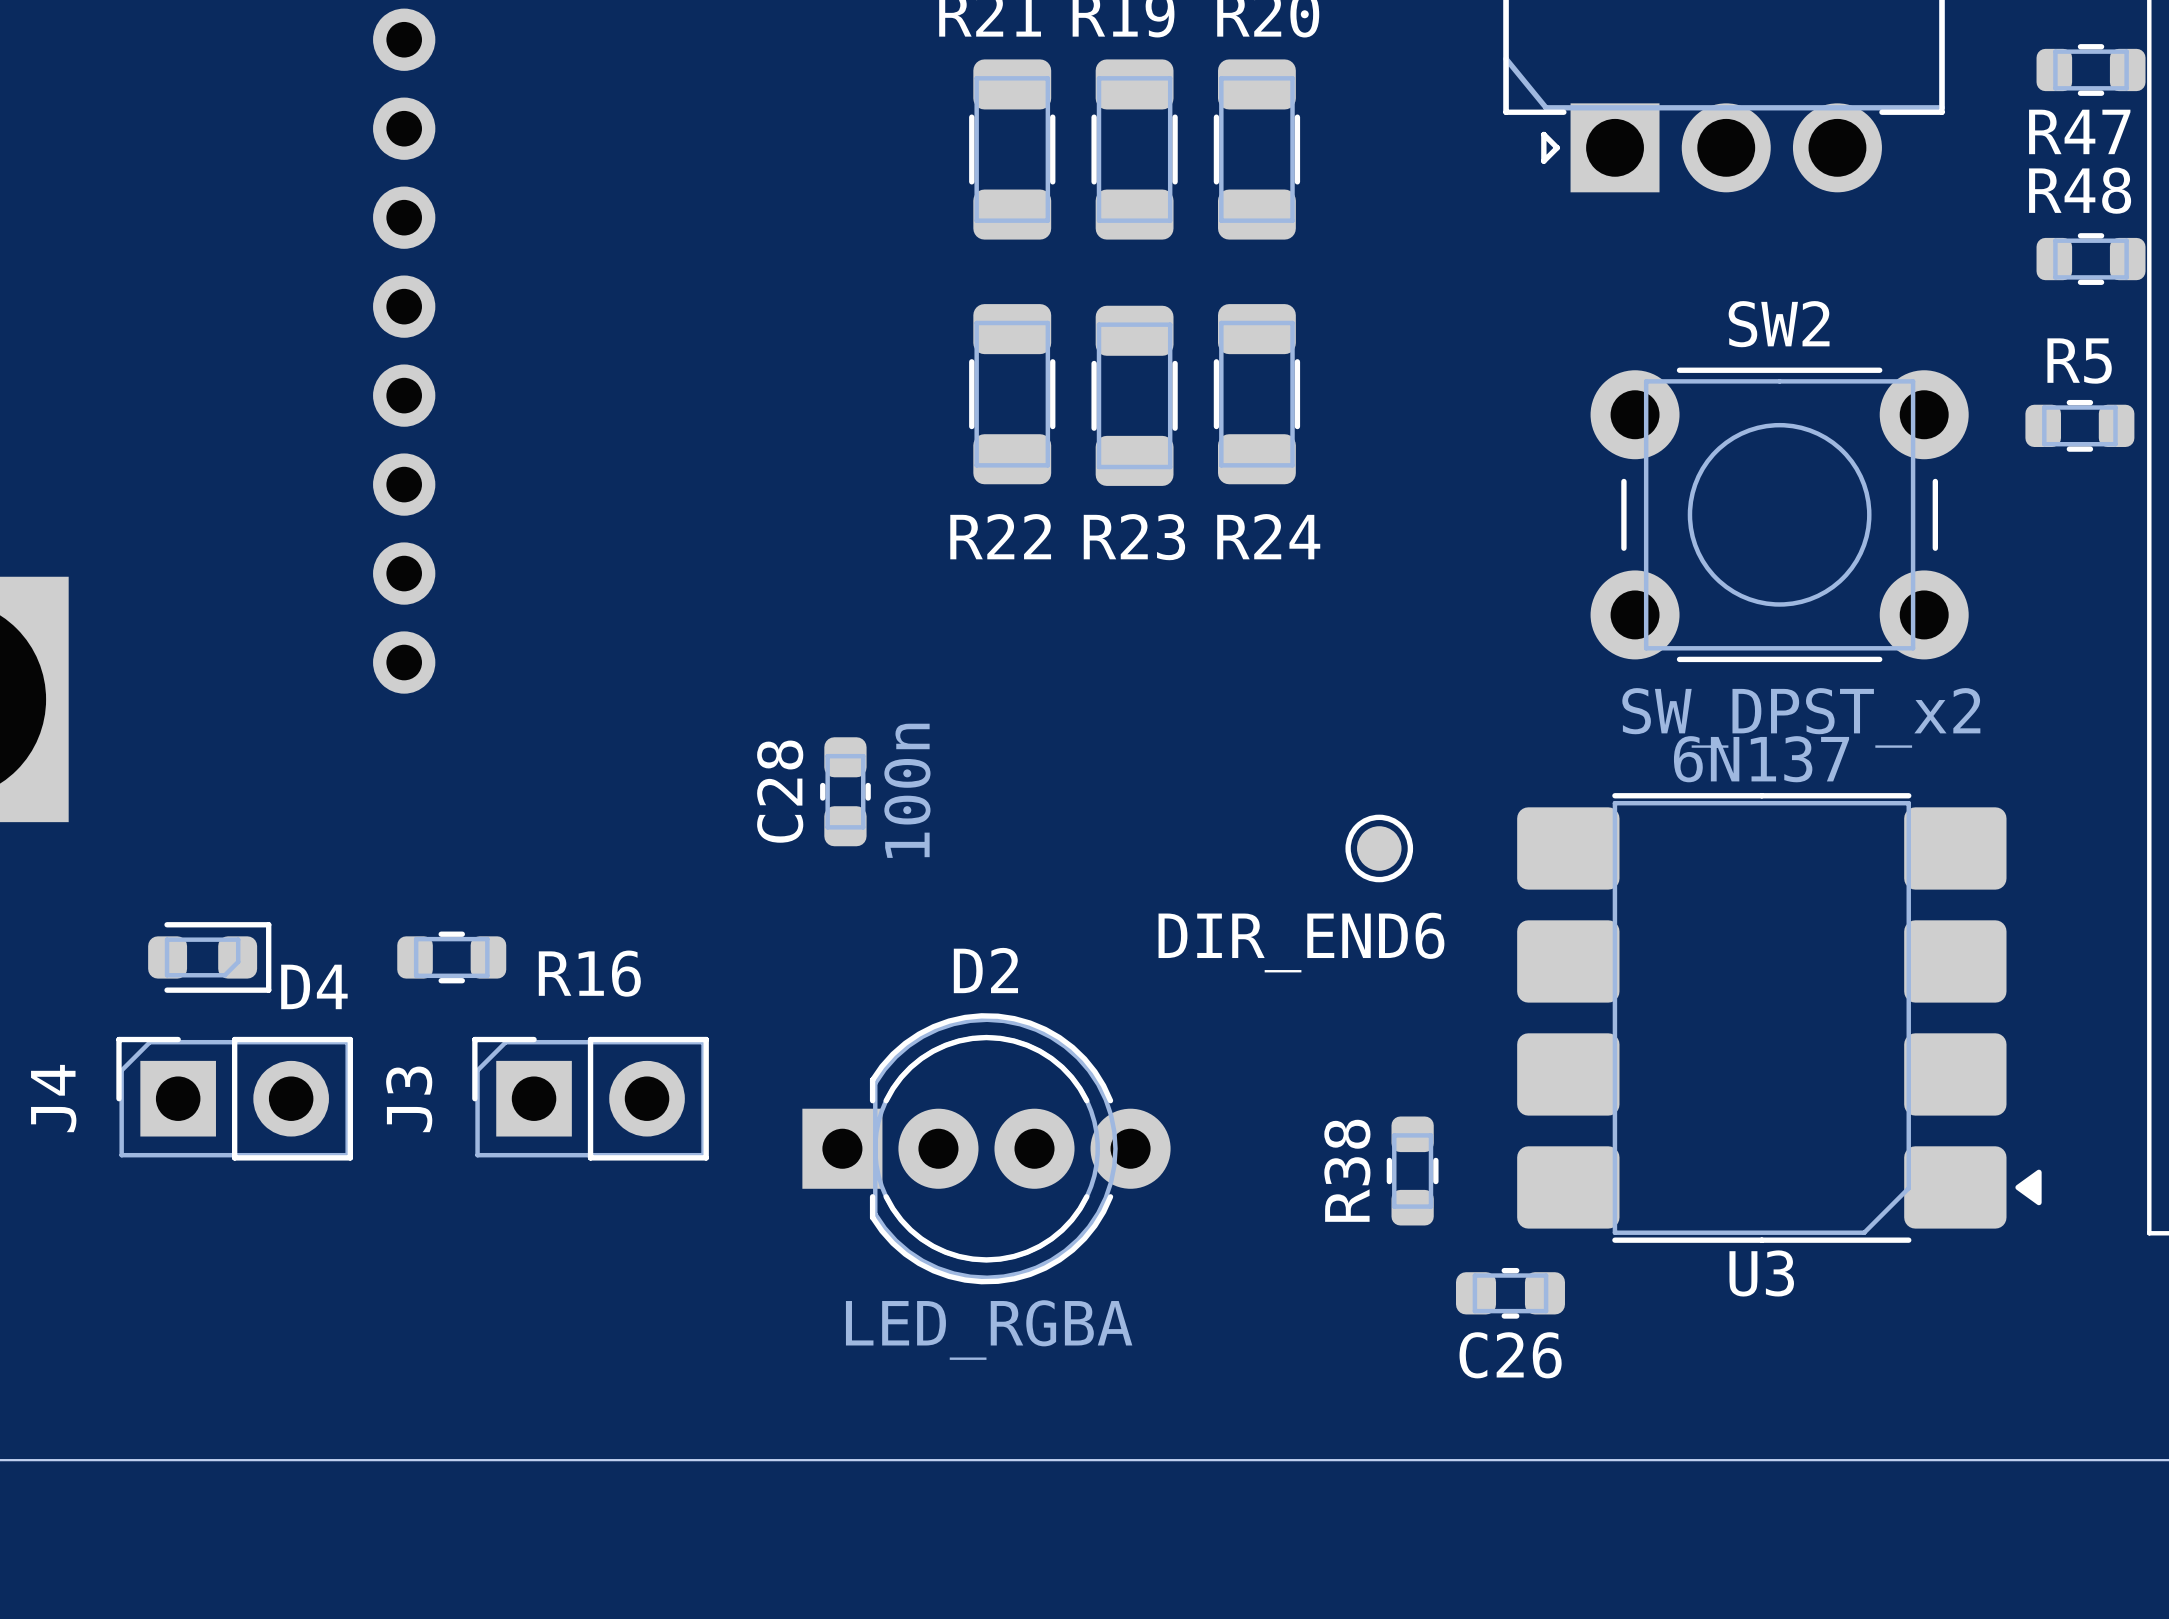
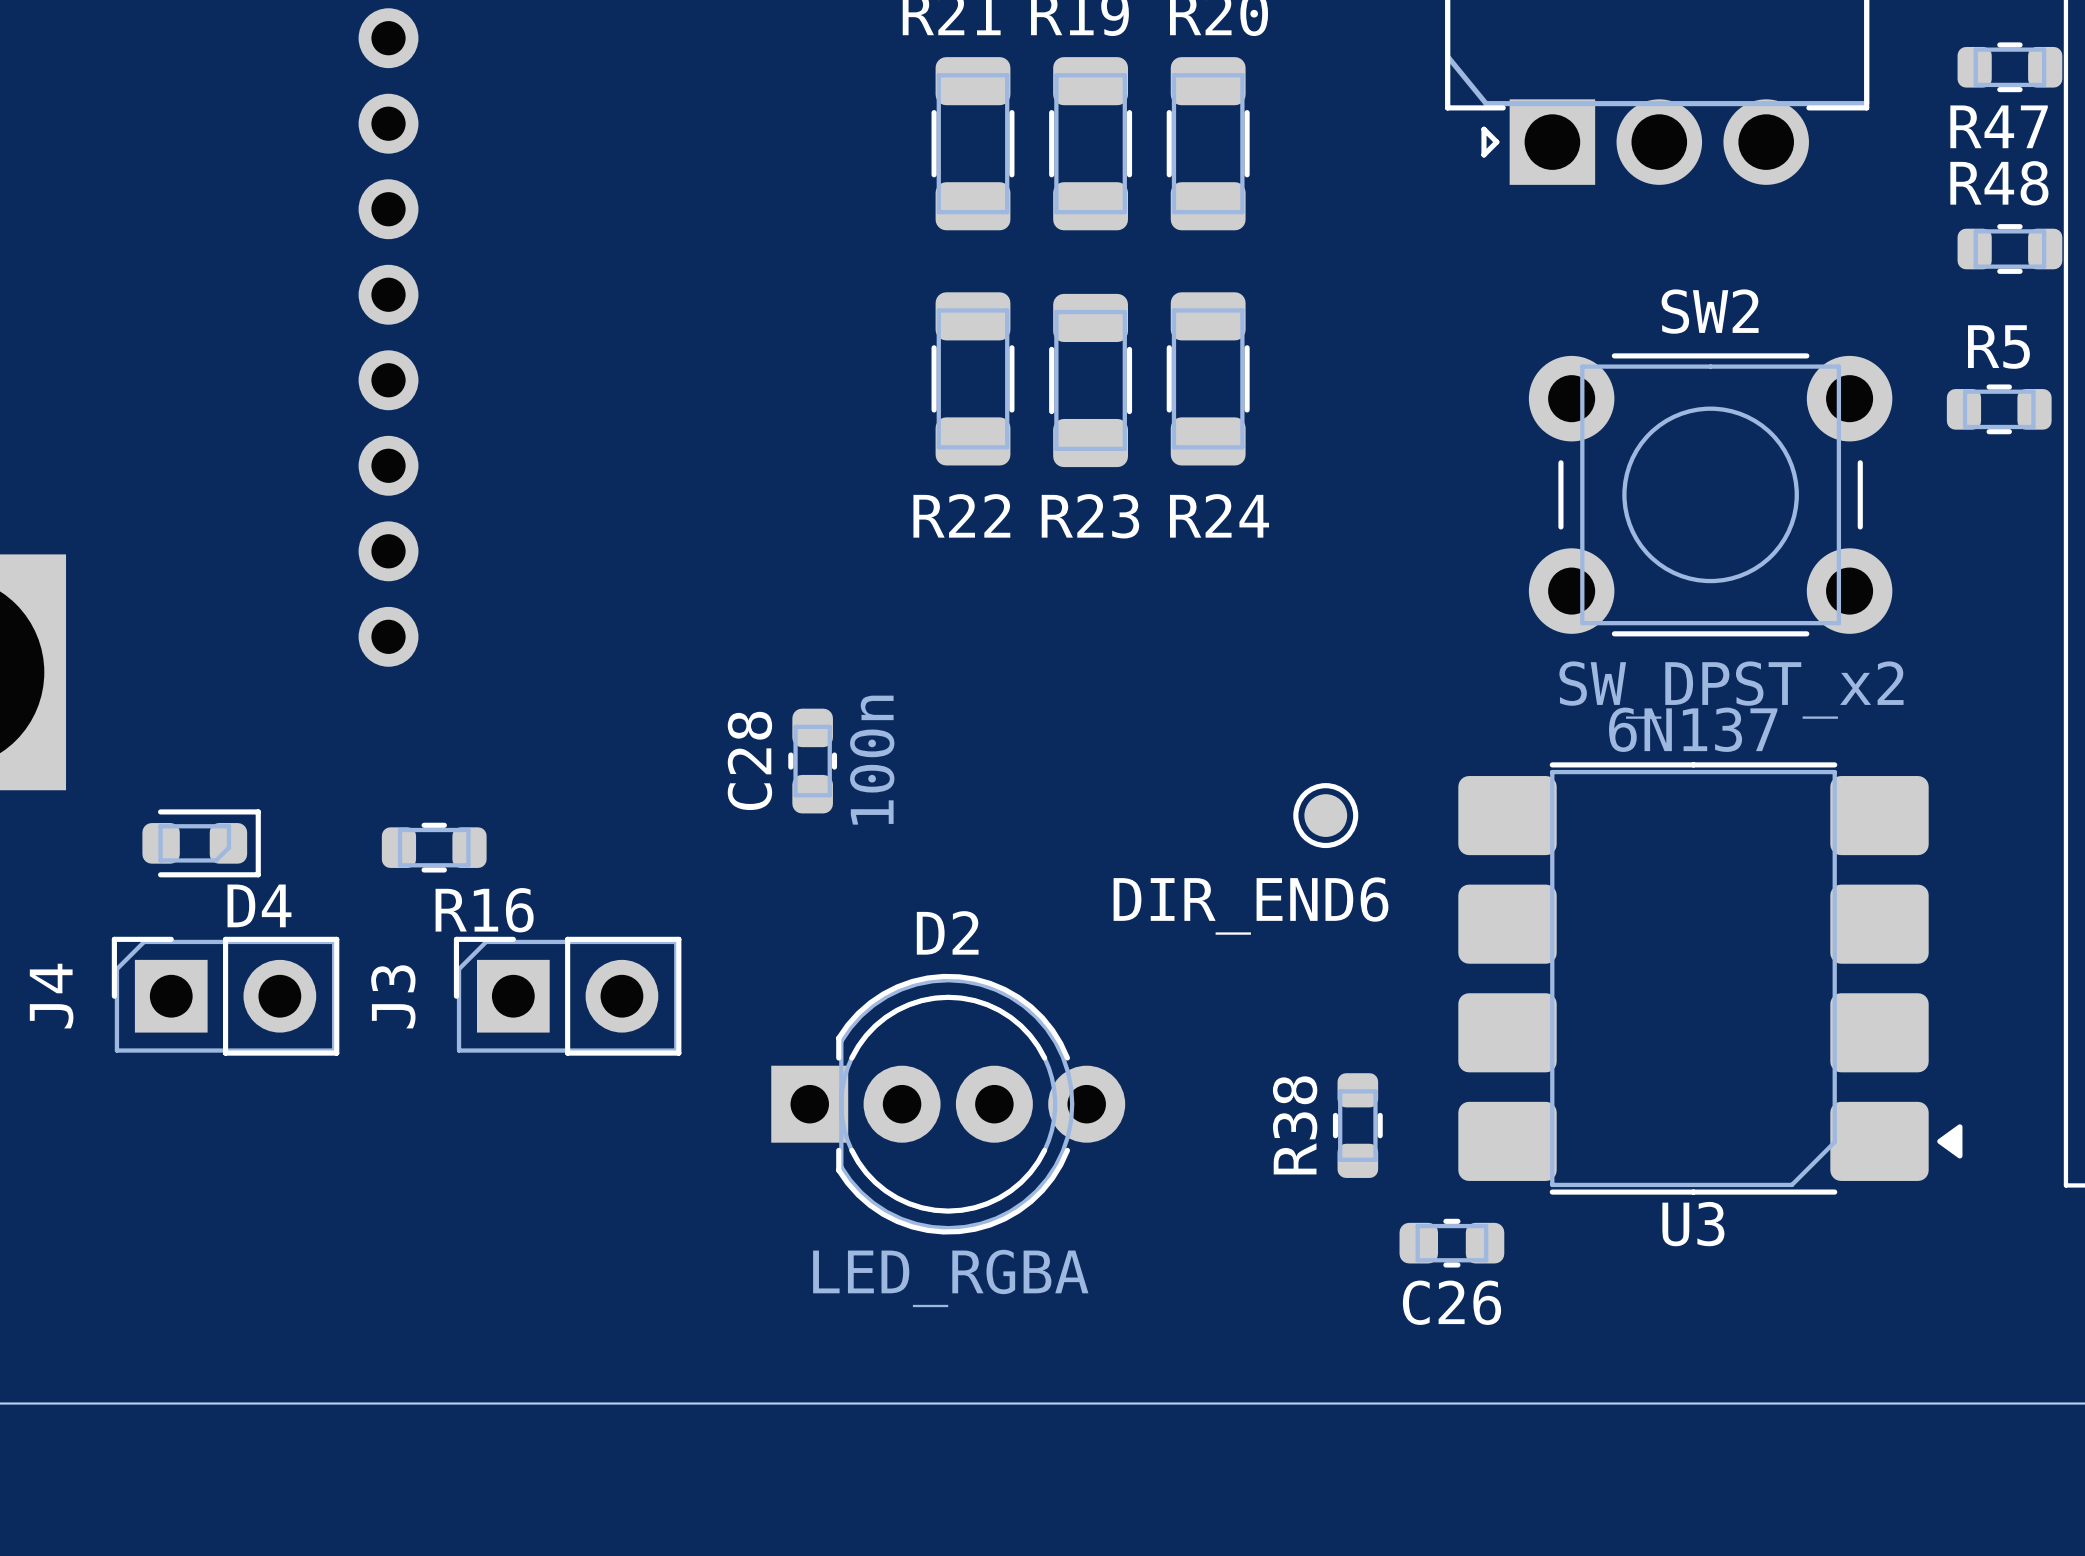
D4 position: (209, 957) -> (201, 843)
R16 position: (451, 957) -> (434, 847)
R16 name position: R16 (589, 973) -> R16 (484, 910)
D4 name position: D4 (314, 986) -> D4 (259, 905)
J4 position: (234, 1098) -> (225, 996)
J3 position: (590, 1098) -> (567, 996)

